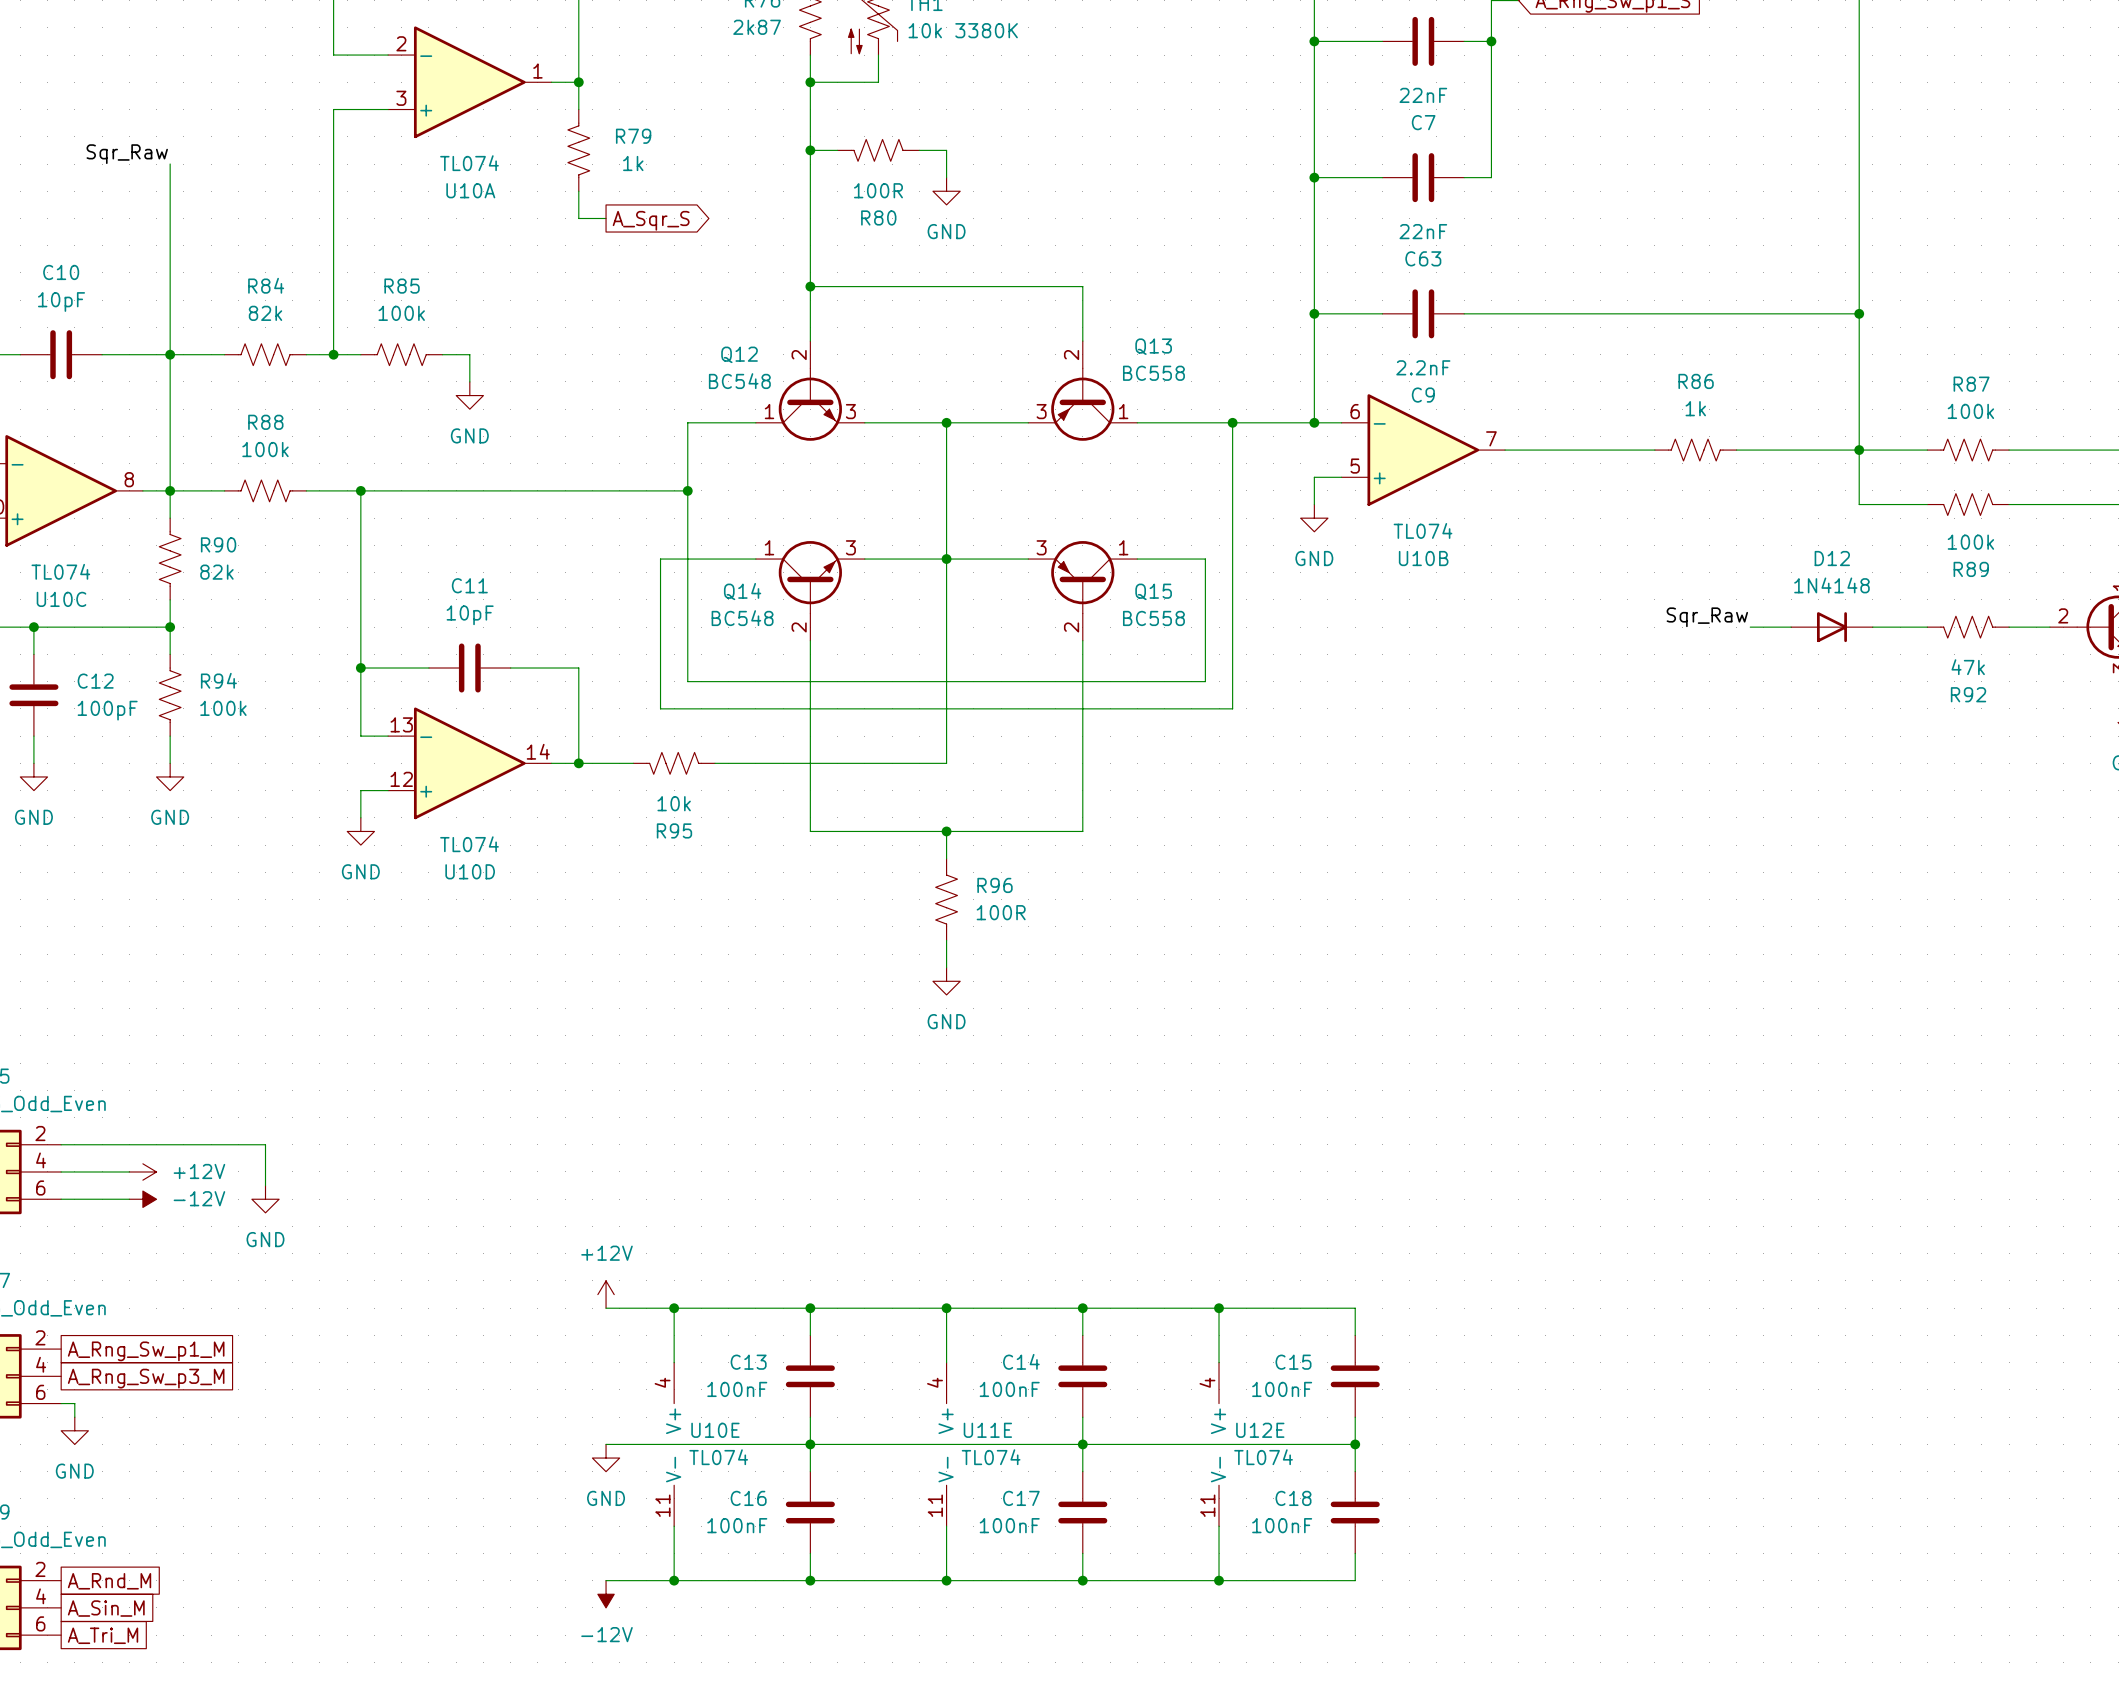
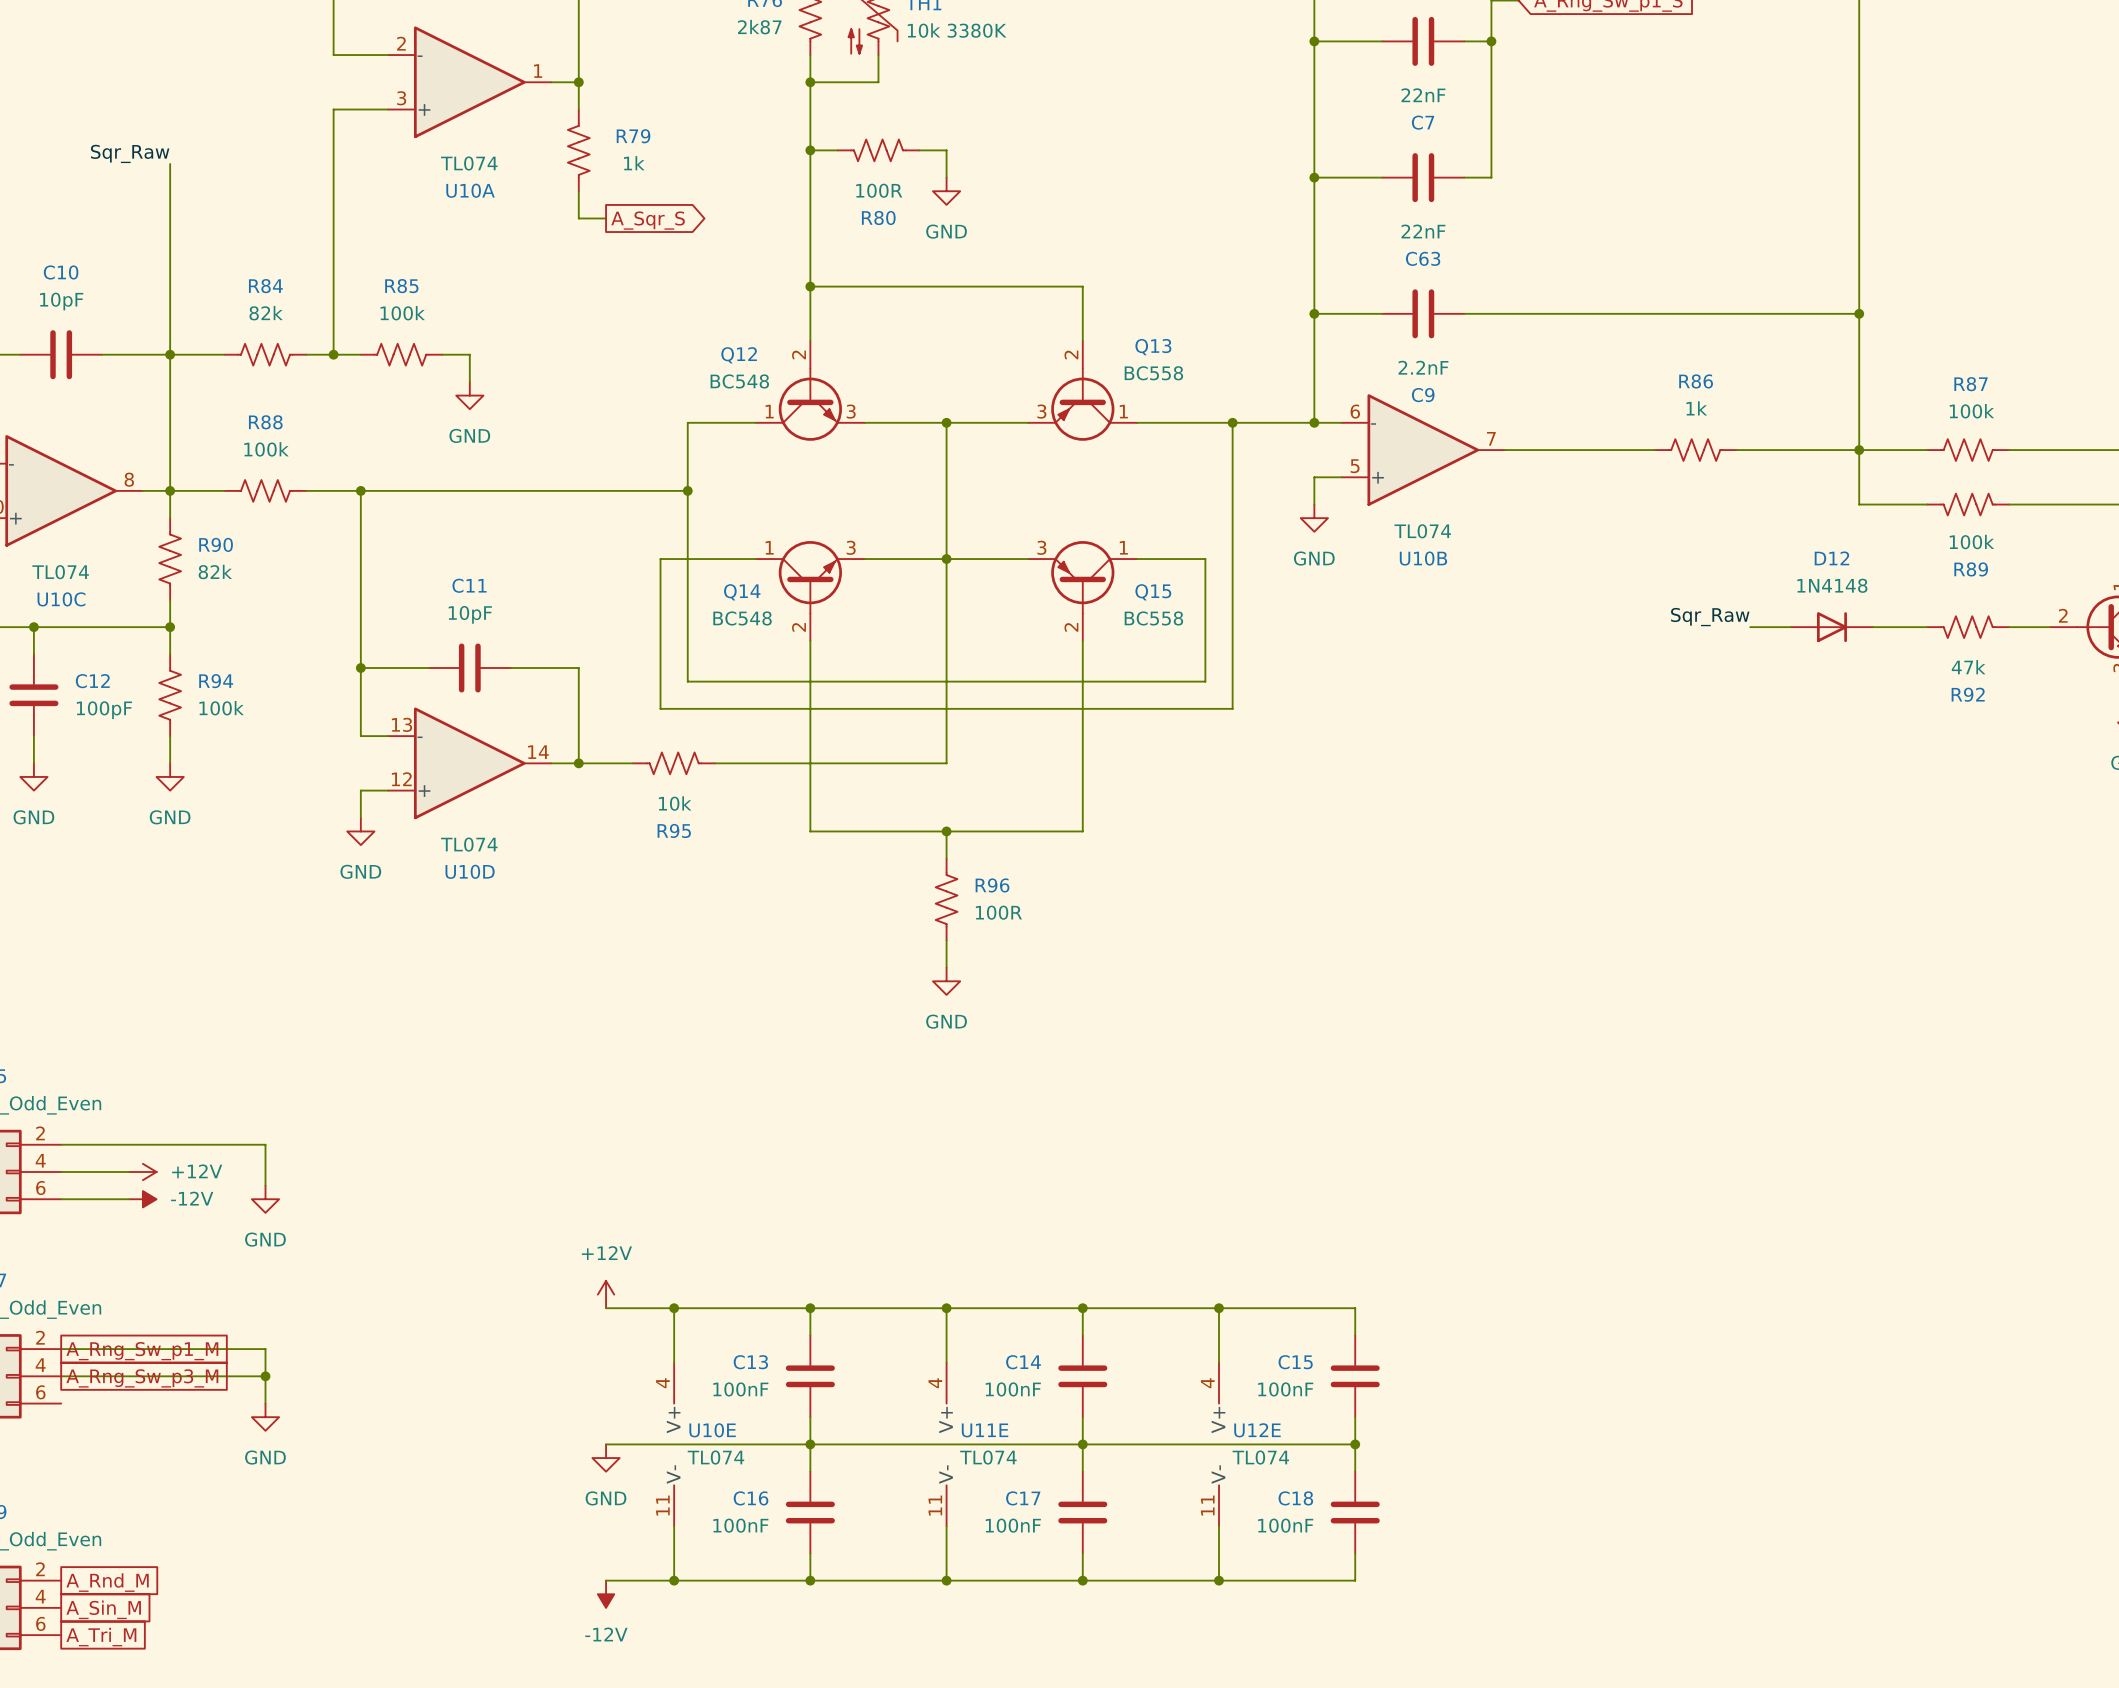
wire: none -> (61, 1349) (265, 1349) (265, 1403)
wire: none -> (61, 1376) (265, 1376)
junction: none -> (265, 1376)
wire: (61, 1403) (74, 1403) (74, 1417) -> none
power symbol position: GND (74, 1430) -> GND (265, 1417)

